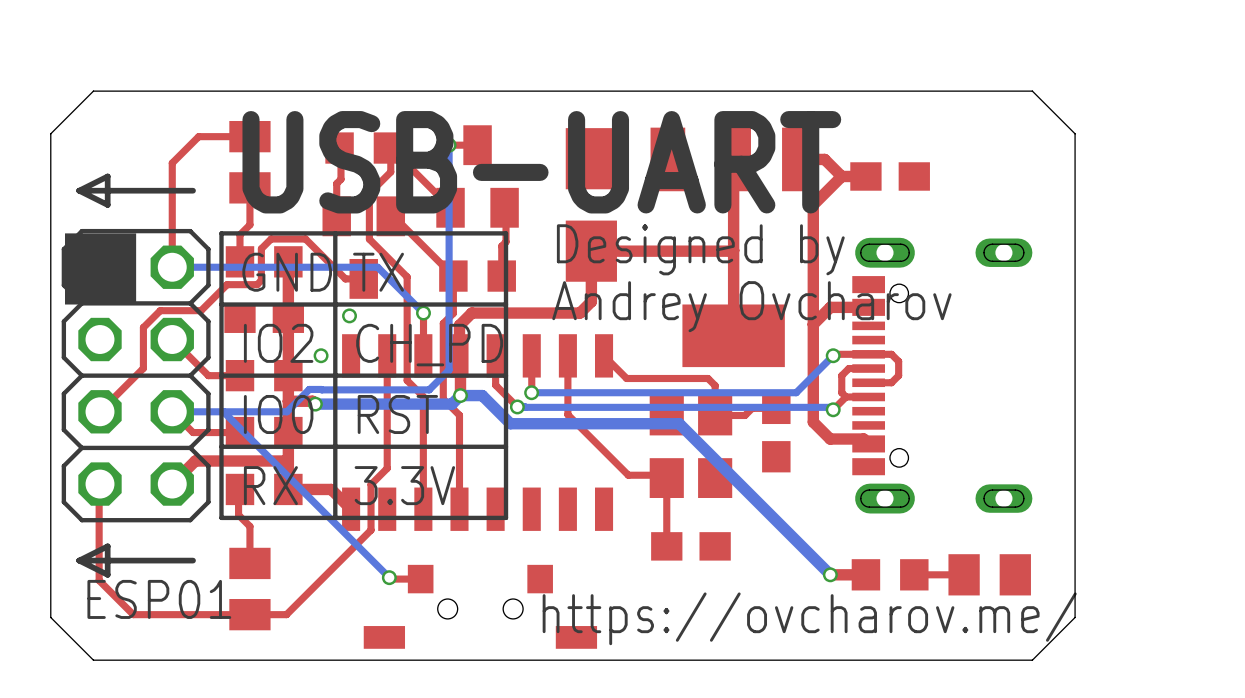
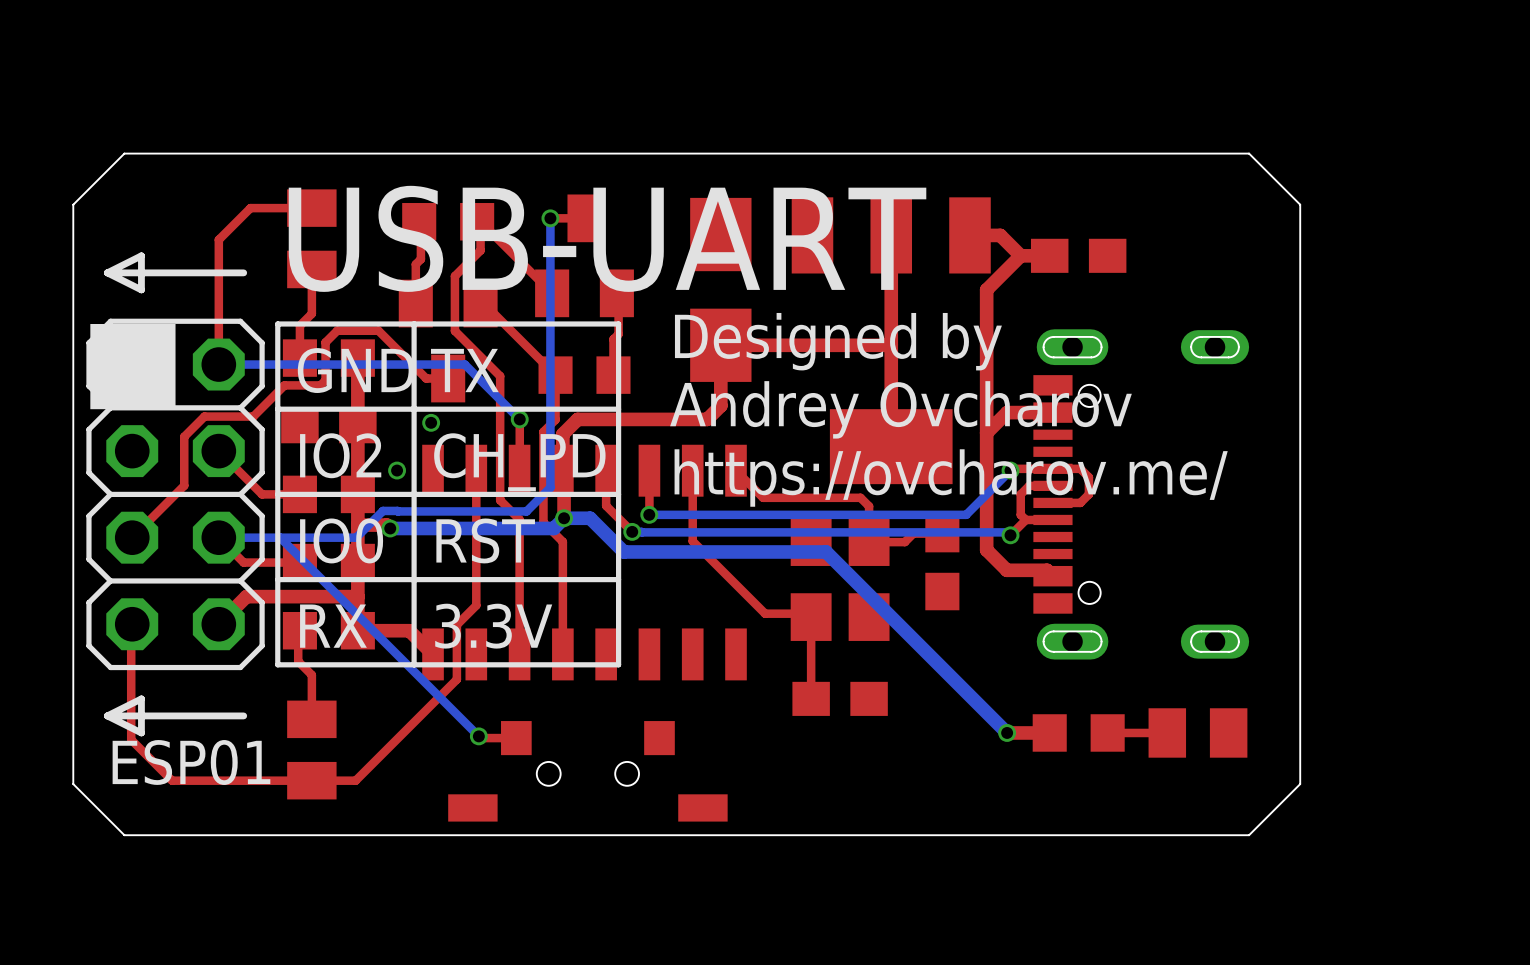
text position: https://ovcharov.me/ (809, 618) -> https://ovcharov.me/ (951, 478)

